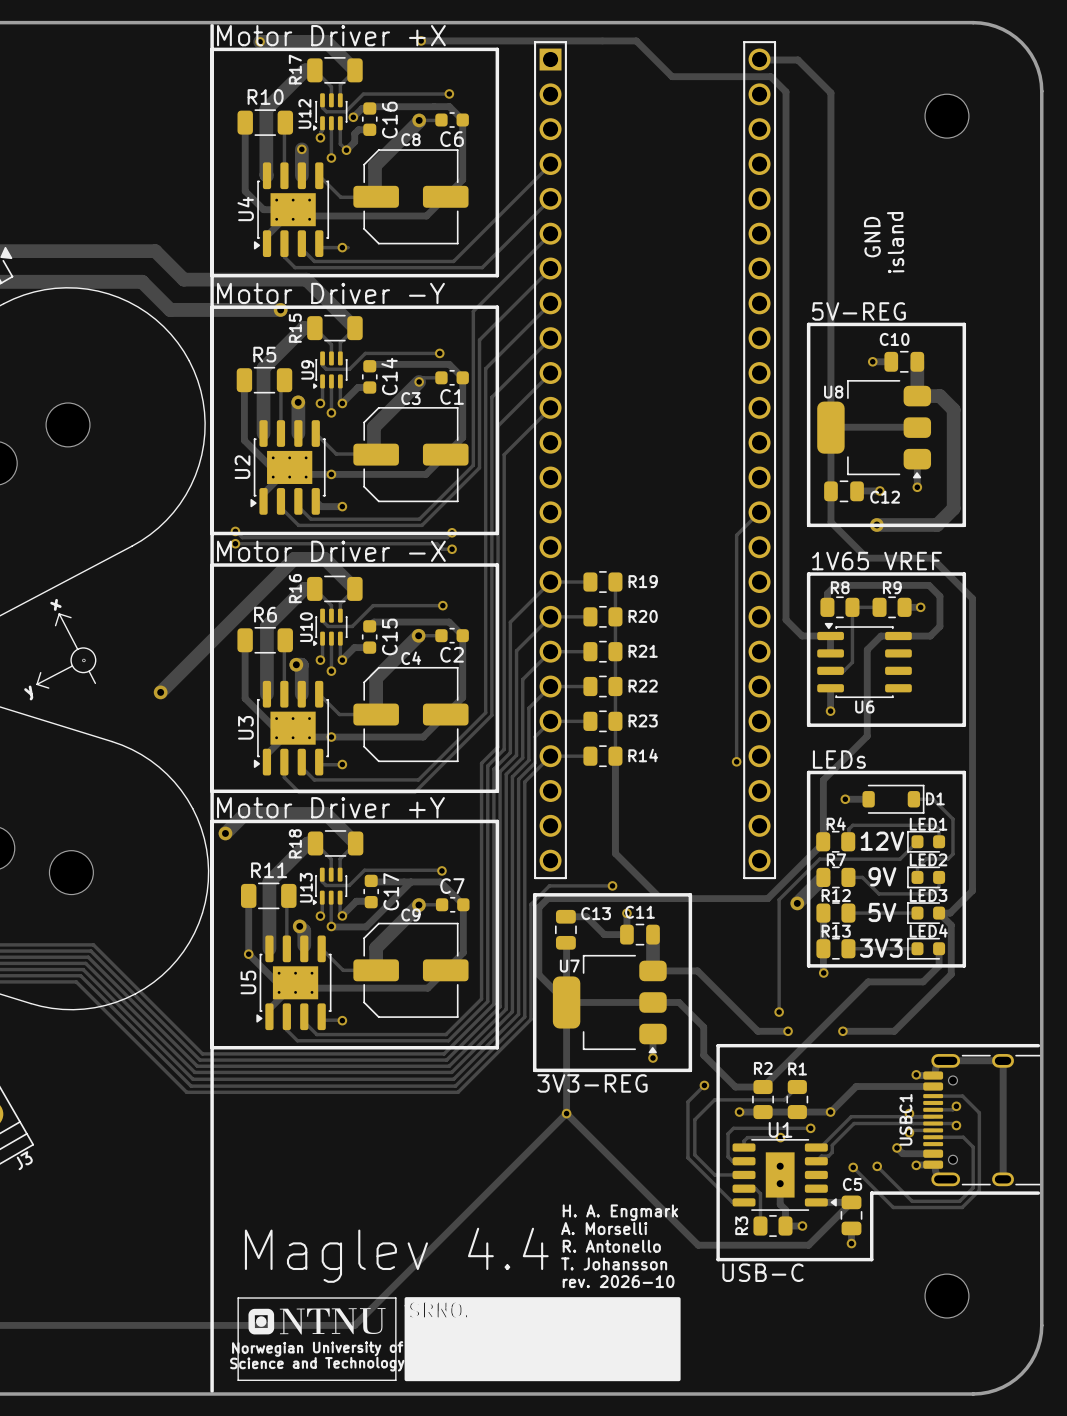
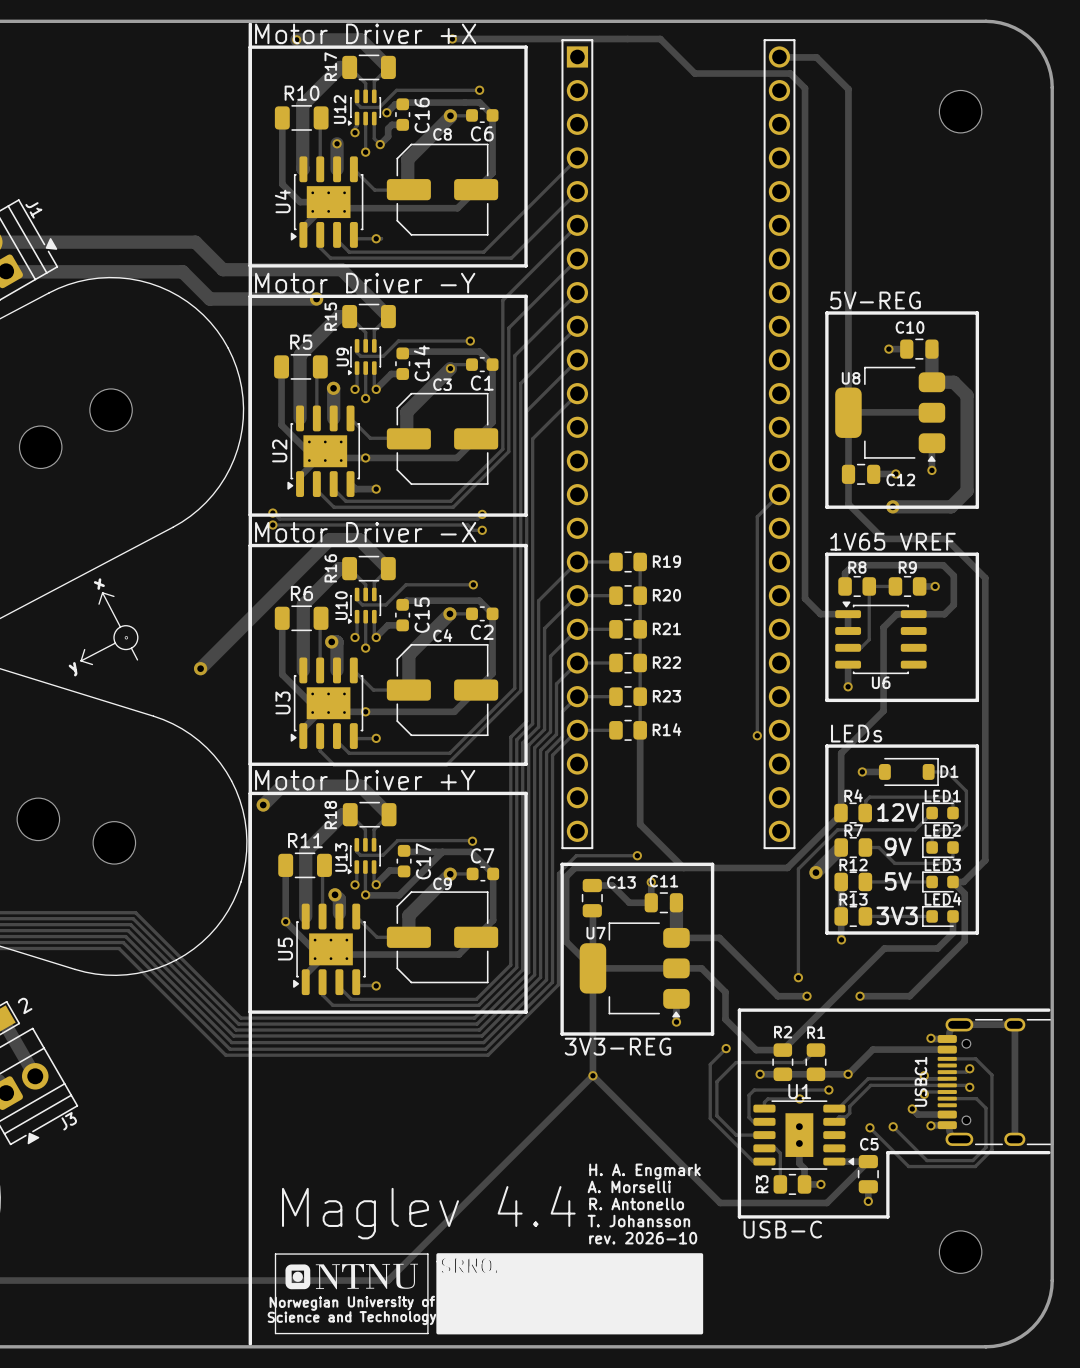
text: GND (872, 237) -> none
text: island (895, 242) -> none

